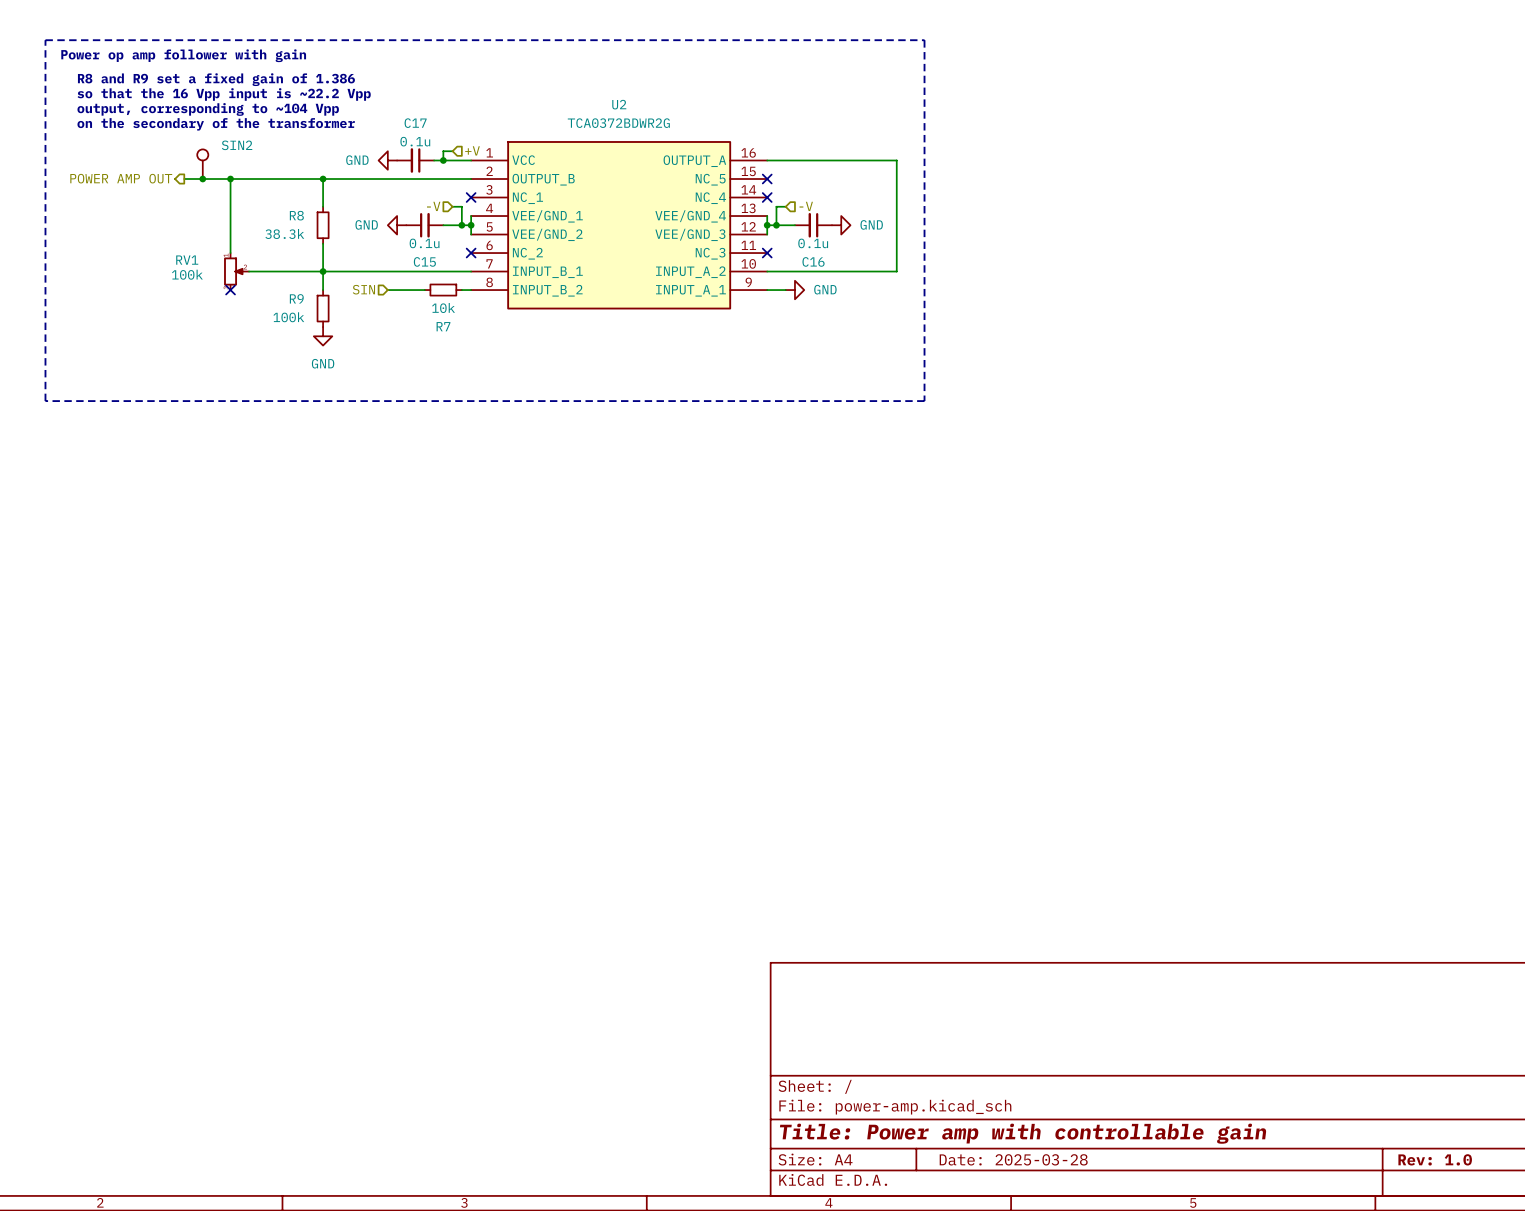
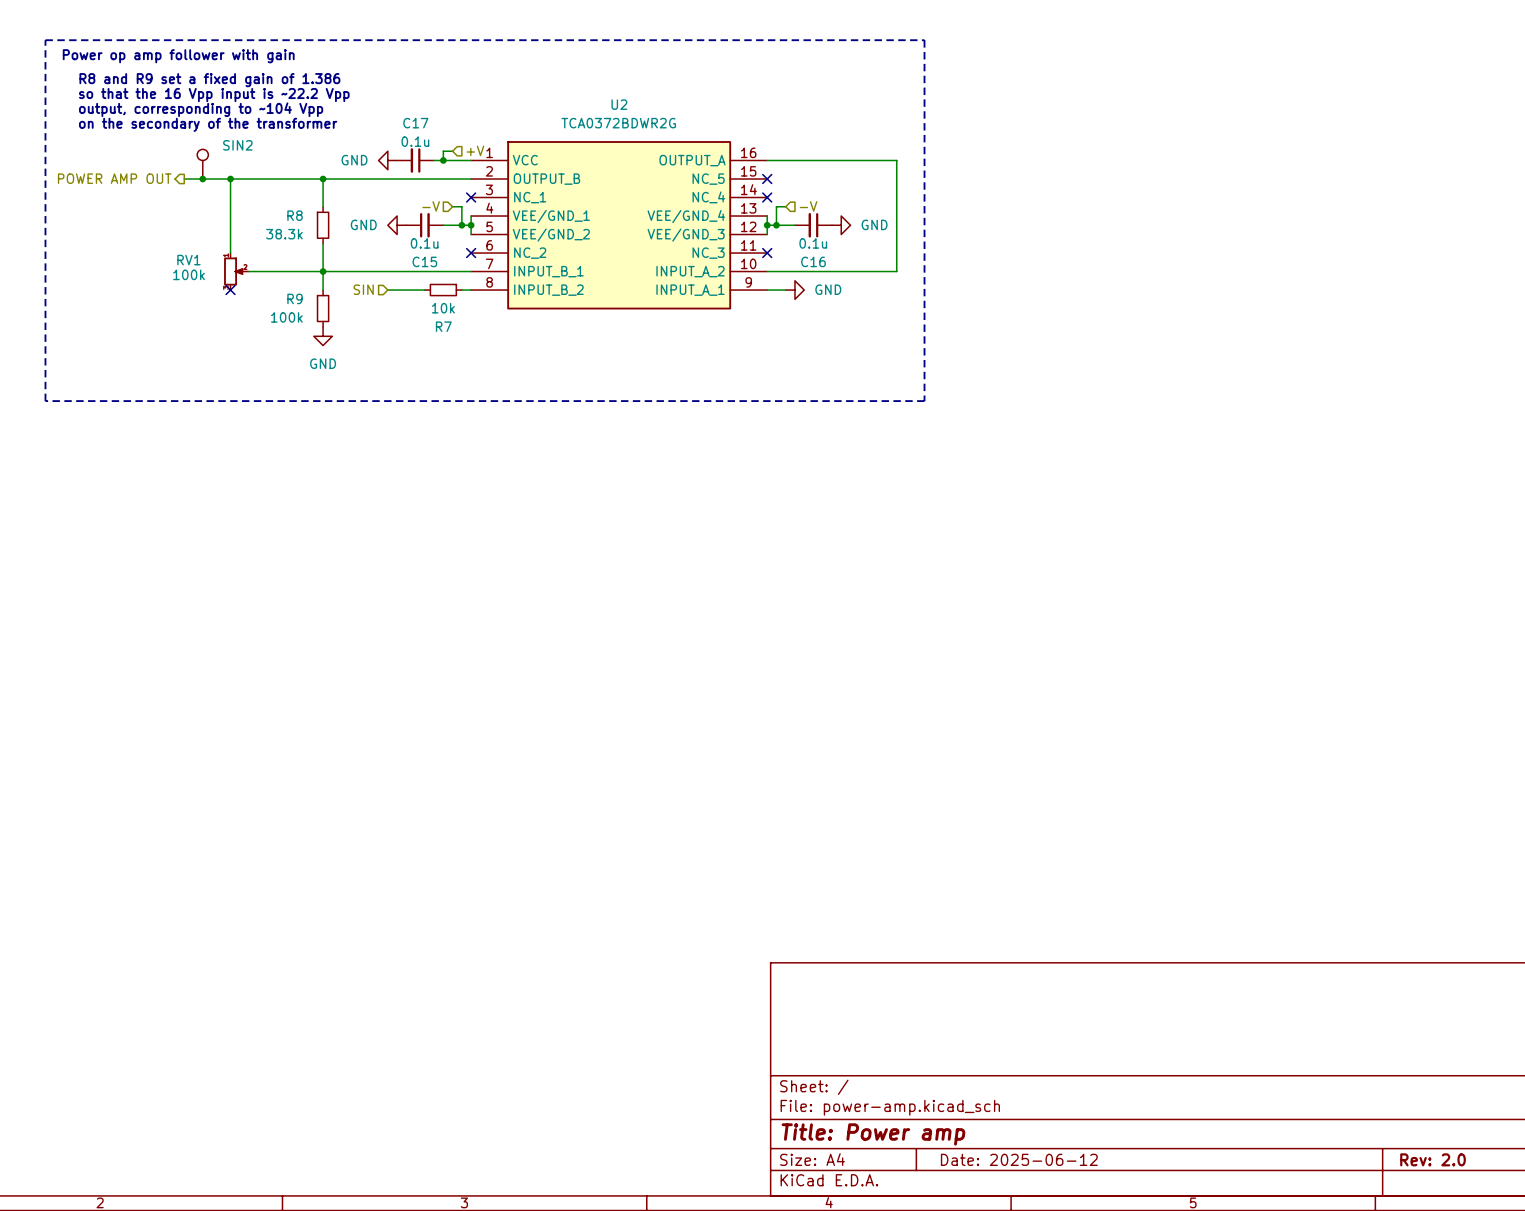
title block: Title: Power amp with controllable gain (1023, 1133) -> Title: Power amp (873, 1134)
title block: Date: 2025-03-28 (1013, 1159) -> Date: 2025-06-12 (1019, 1159)
title block: Rev: 1.0 (1435, 1159) -> Rev: 2.0 (1433, 1159)

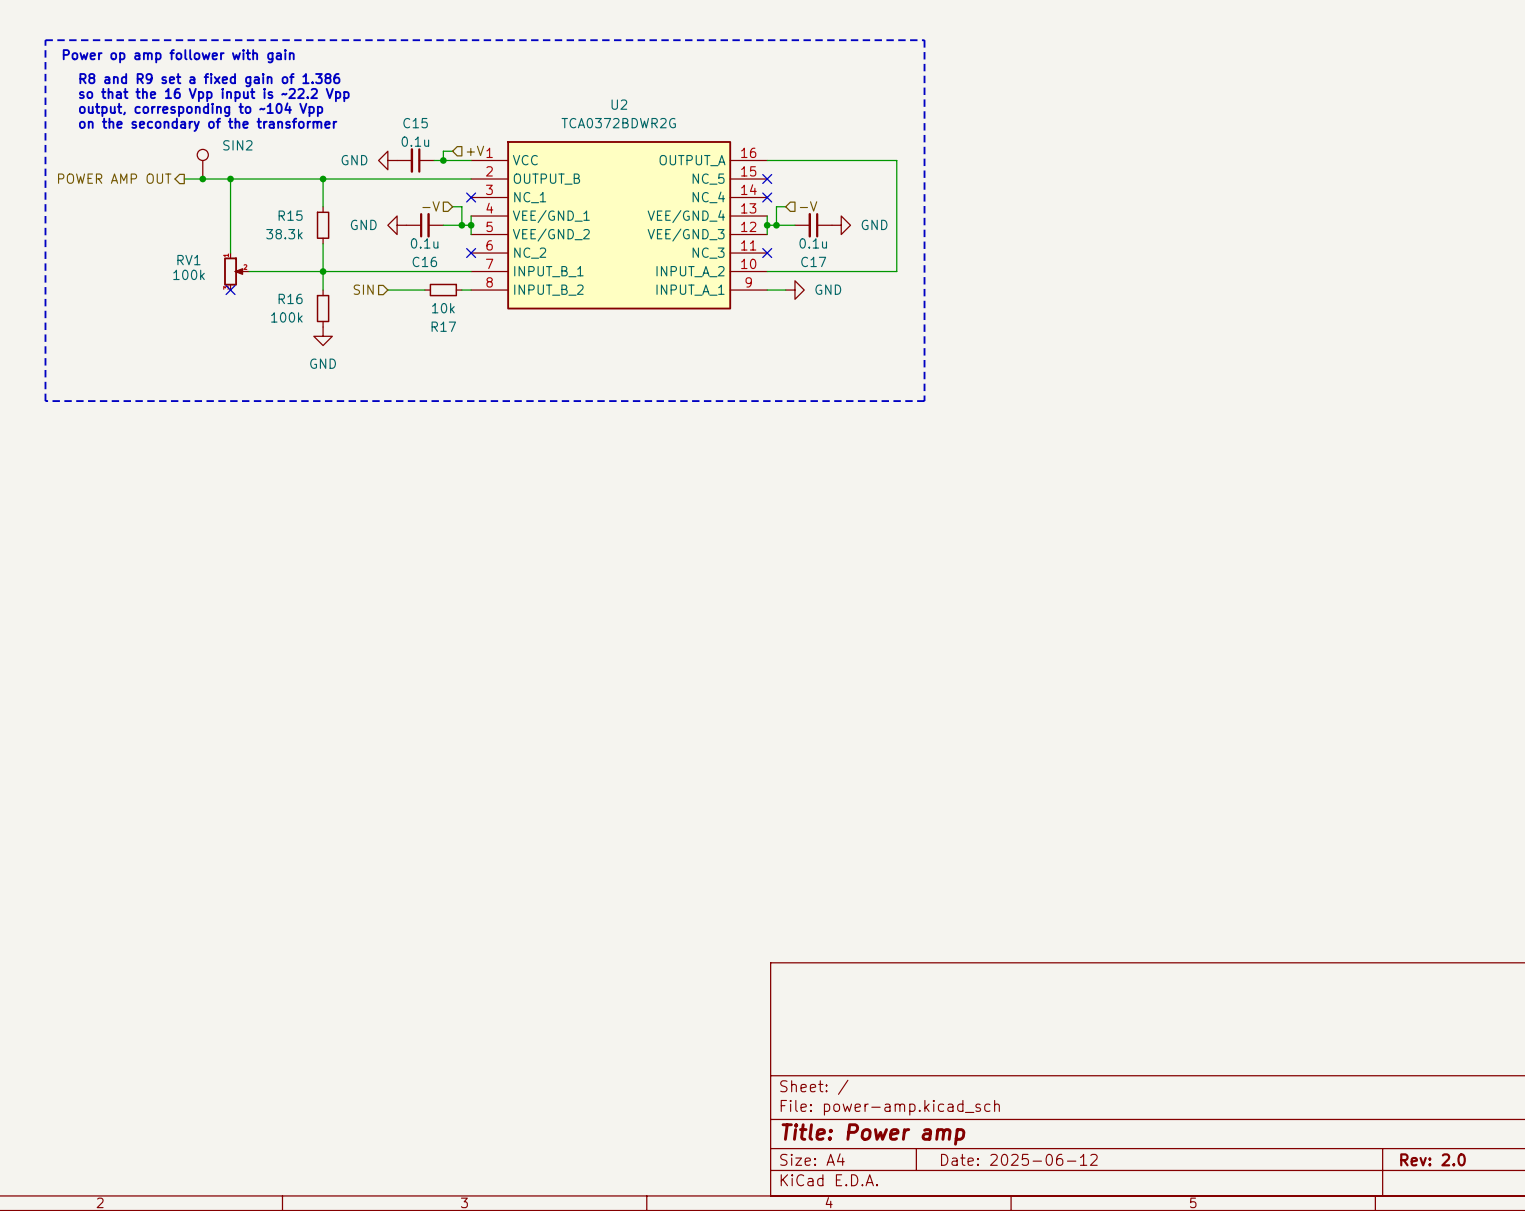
C17 name: C17 (415, 123) -> C15 (415, 123)
R8 name: R8 (295, 215) -> R15 (290, 215)
C15 name: C15 (424, 261) -> C16 (424, 261)
C16 name: C16 (813, 261) -> C17 (813, 261)
R9 name: R9 (295, 298) -> R16 (290, 298)
R7 name: R7 (443, 326) -> R17 (443, 326)

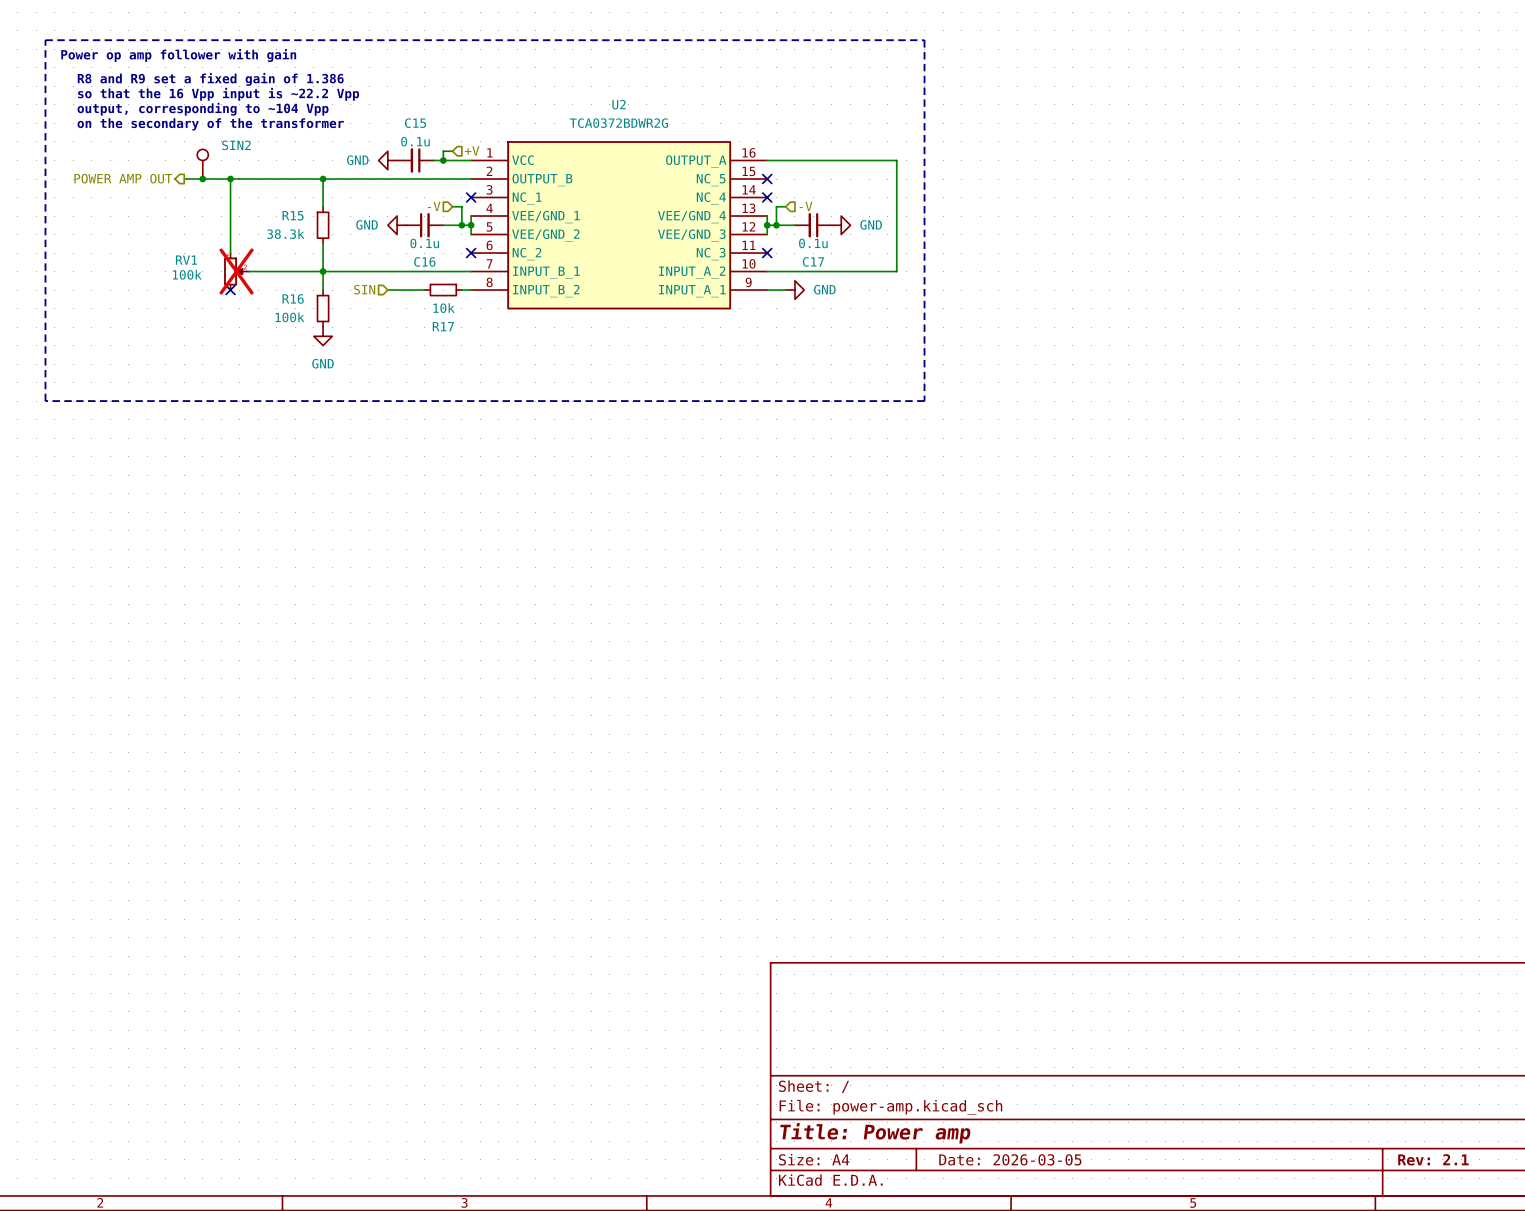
RV1 do-not-place cross: none -> (236, 271)
title block: Date: 2025-06-12 (1019, 1159) -> Date: 2026-03-05 (1010, 1159)
title block: Rev: 2.0 (1433, 1159) -> Rev: 2.1 (1433, 1159)

